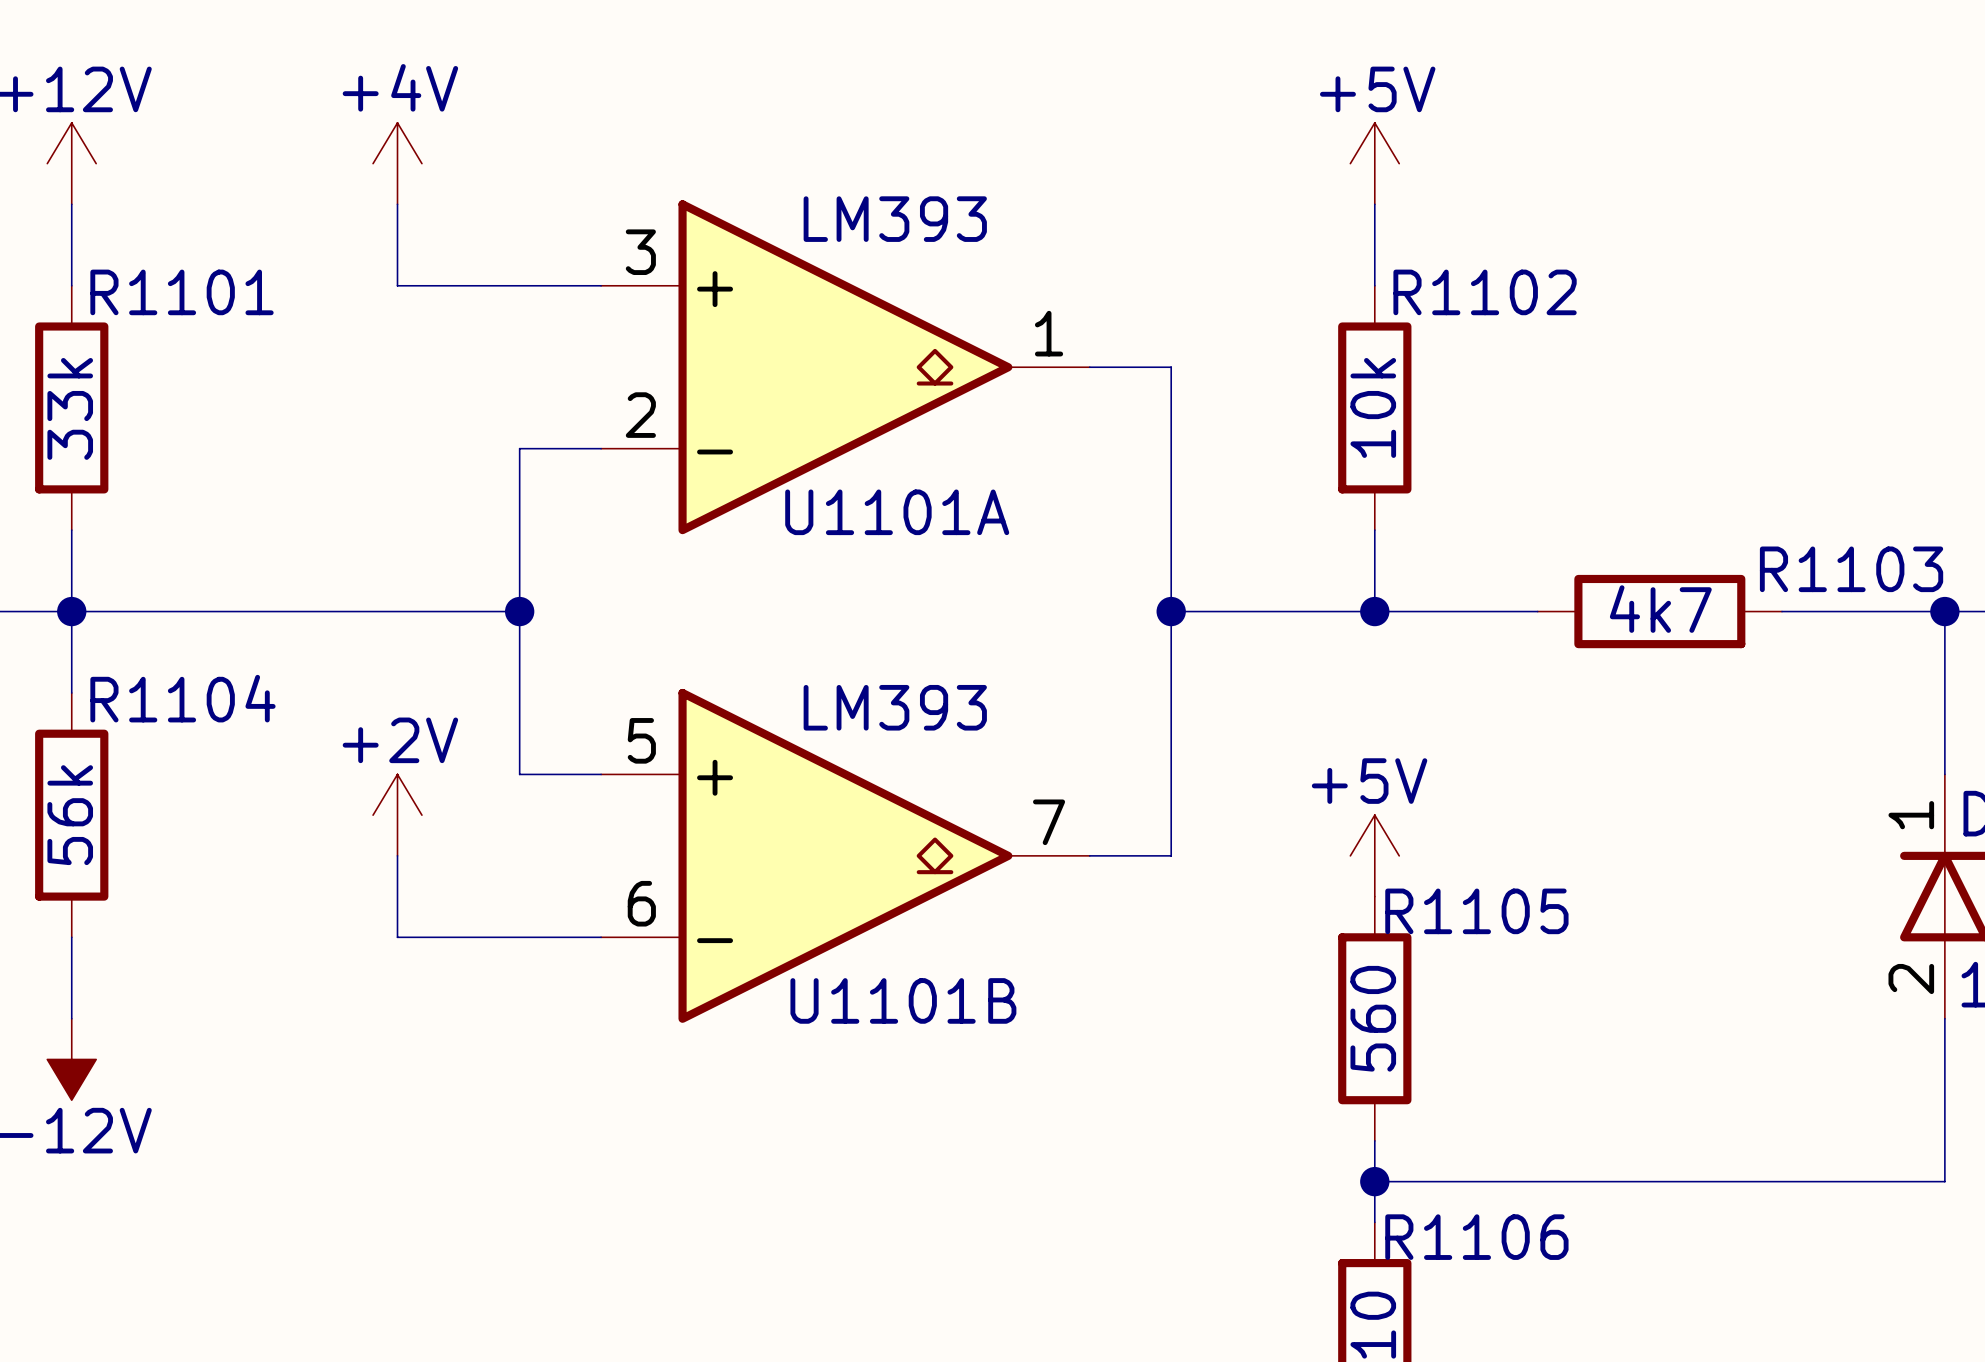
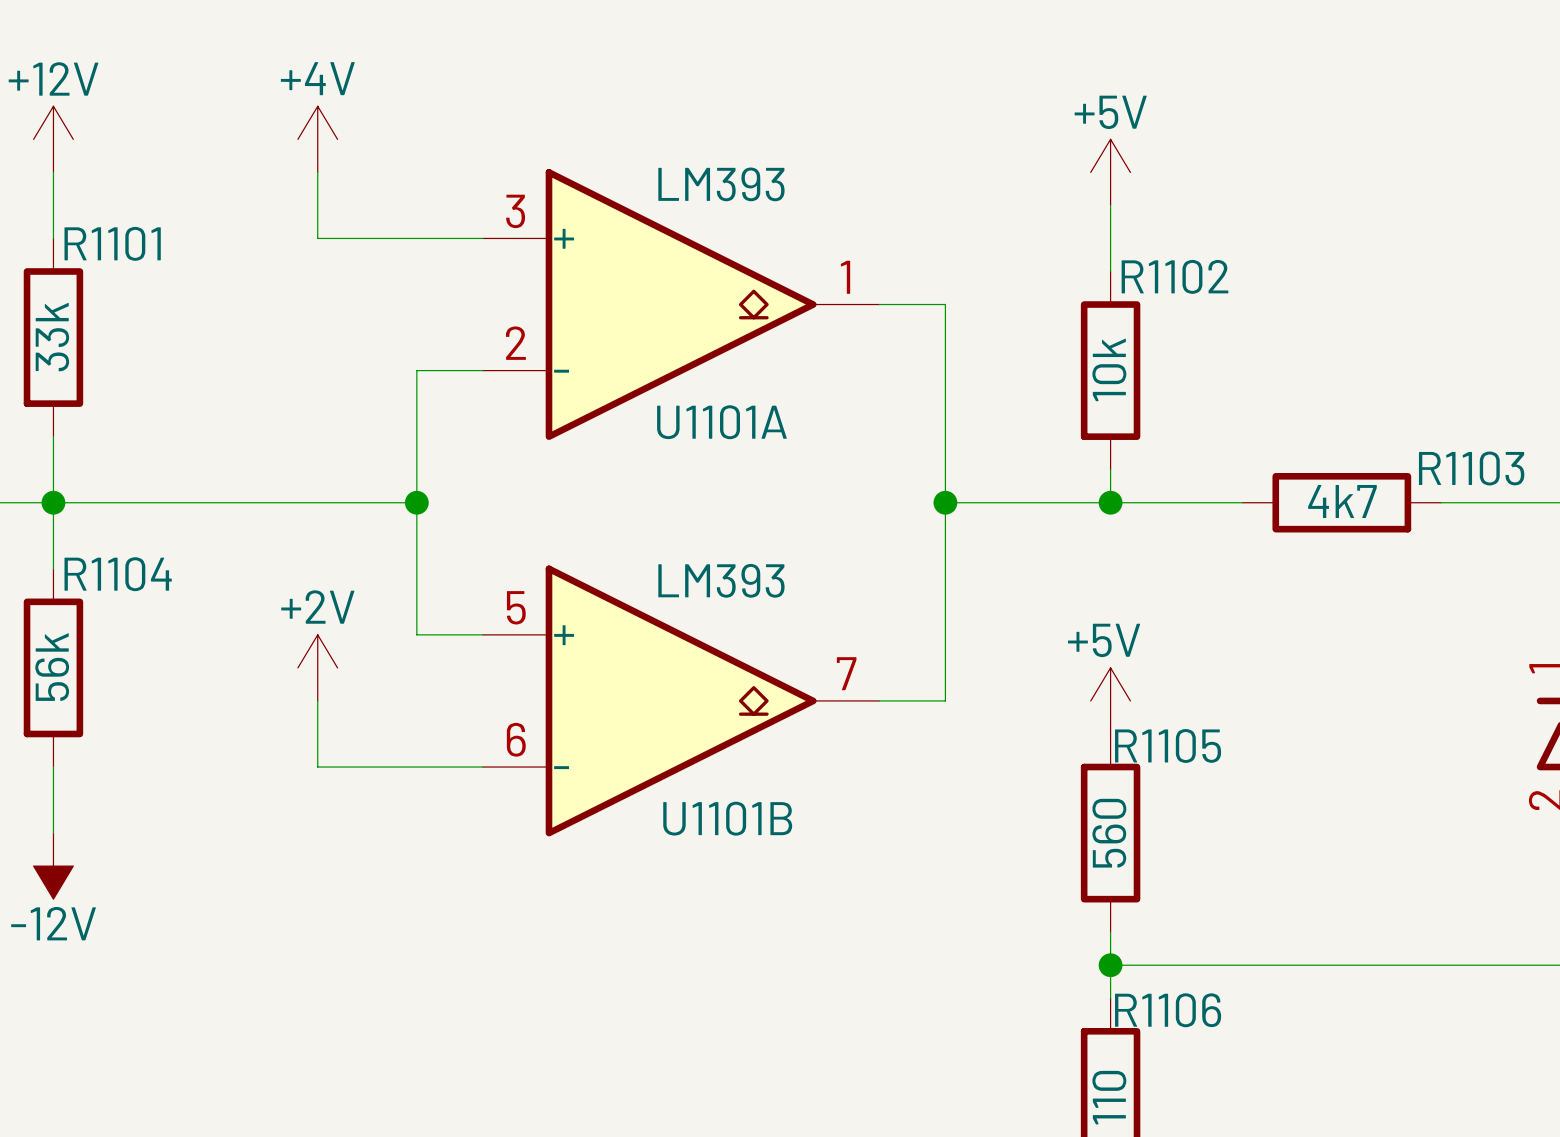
power symbol position: +5V (1374, 163) -> +5V (1110, 172)
R1102 position: (1374, 407) -> (1110, 370)

